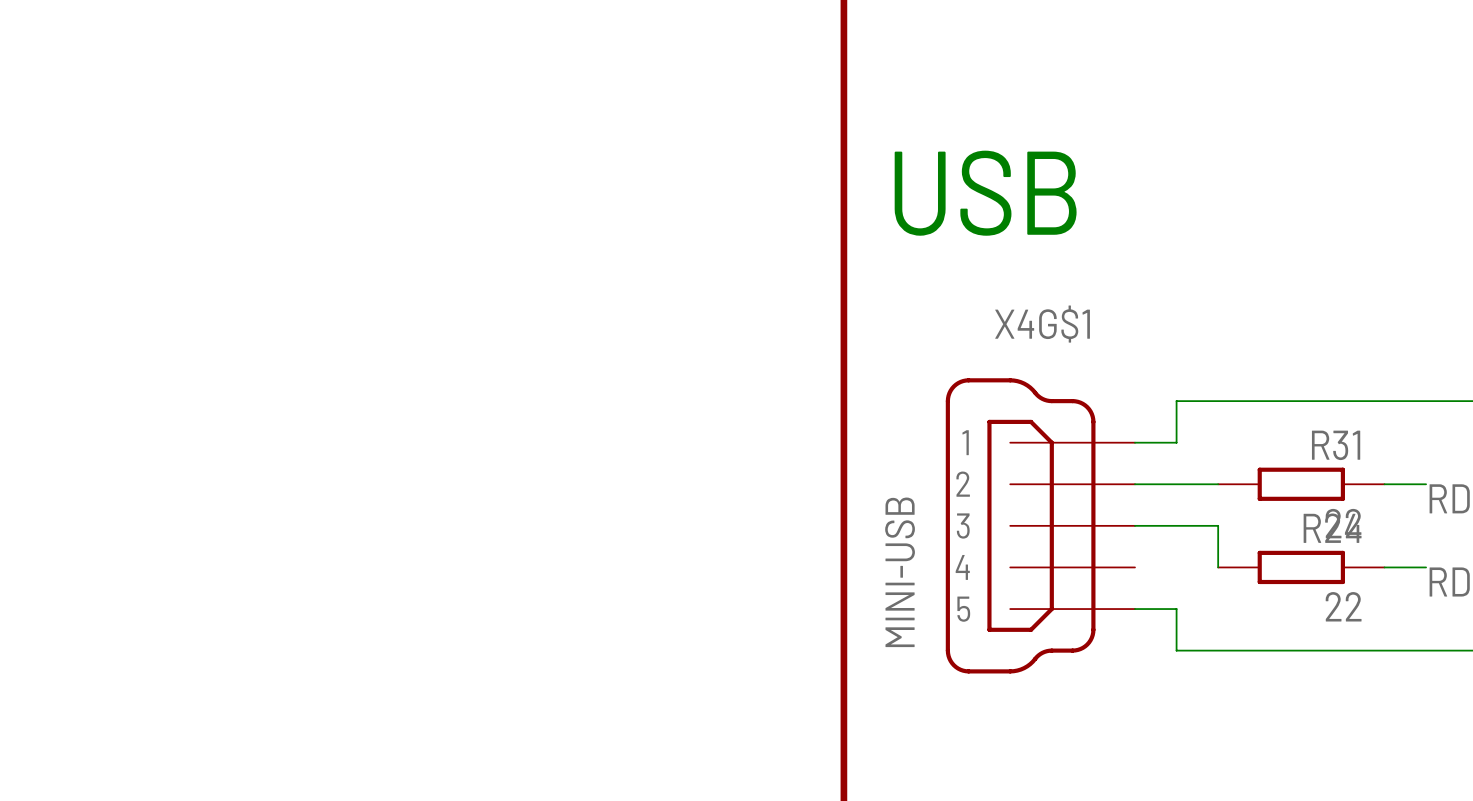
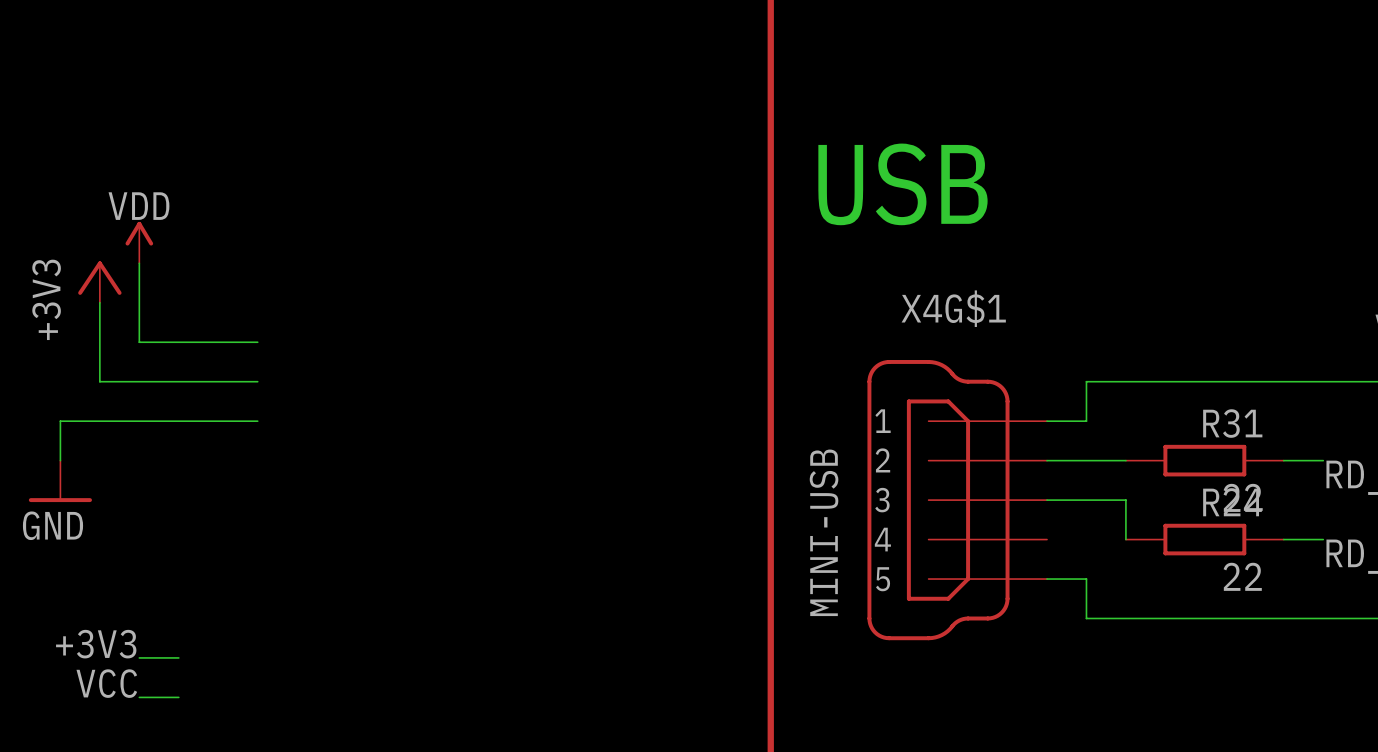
power symbol: none -> VDD (139, 242)
wire: none -> (139, 263) (139, 342) (257, 342)
power symbol: none -> +3V3 (99, 282)
wire: none -> (99, 302) (99, 381) (257, 381)
wire: none -> (257, 421) (60, 421) (60, 460)
power symbol: none -> GND (60, 481)
label: none -> +3V3 (96, 644)
wire: none -> (139, 657) (178, 657)
label: none -> VCC (106, 683)
wire: none -> (139, 697) (178, 697)

